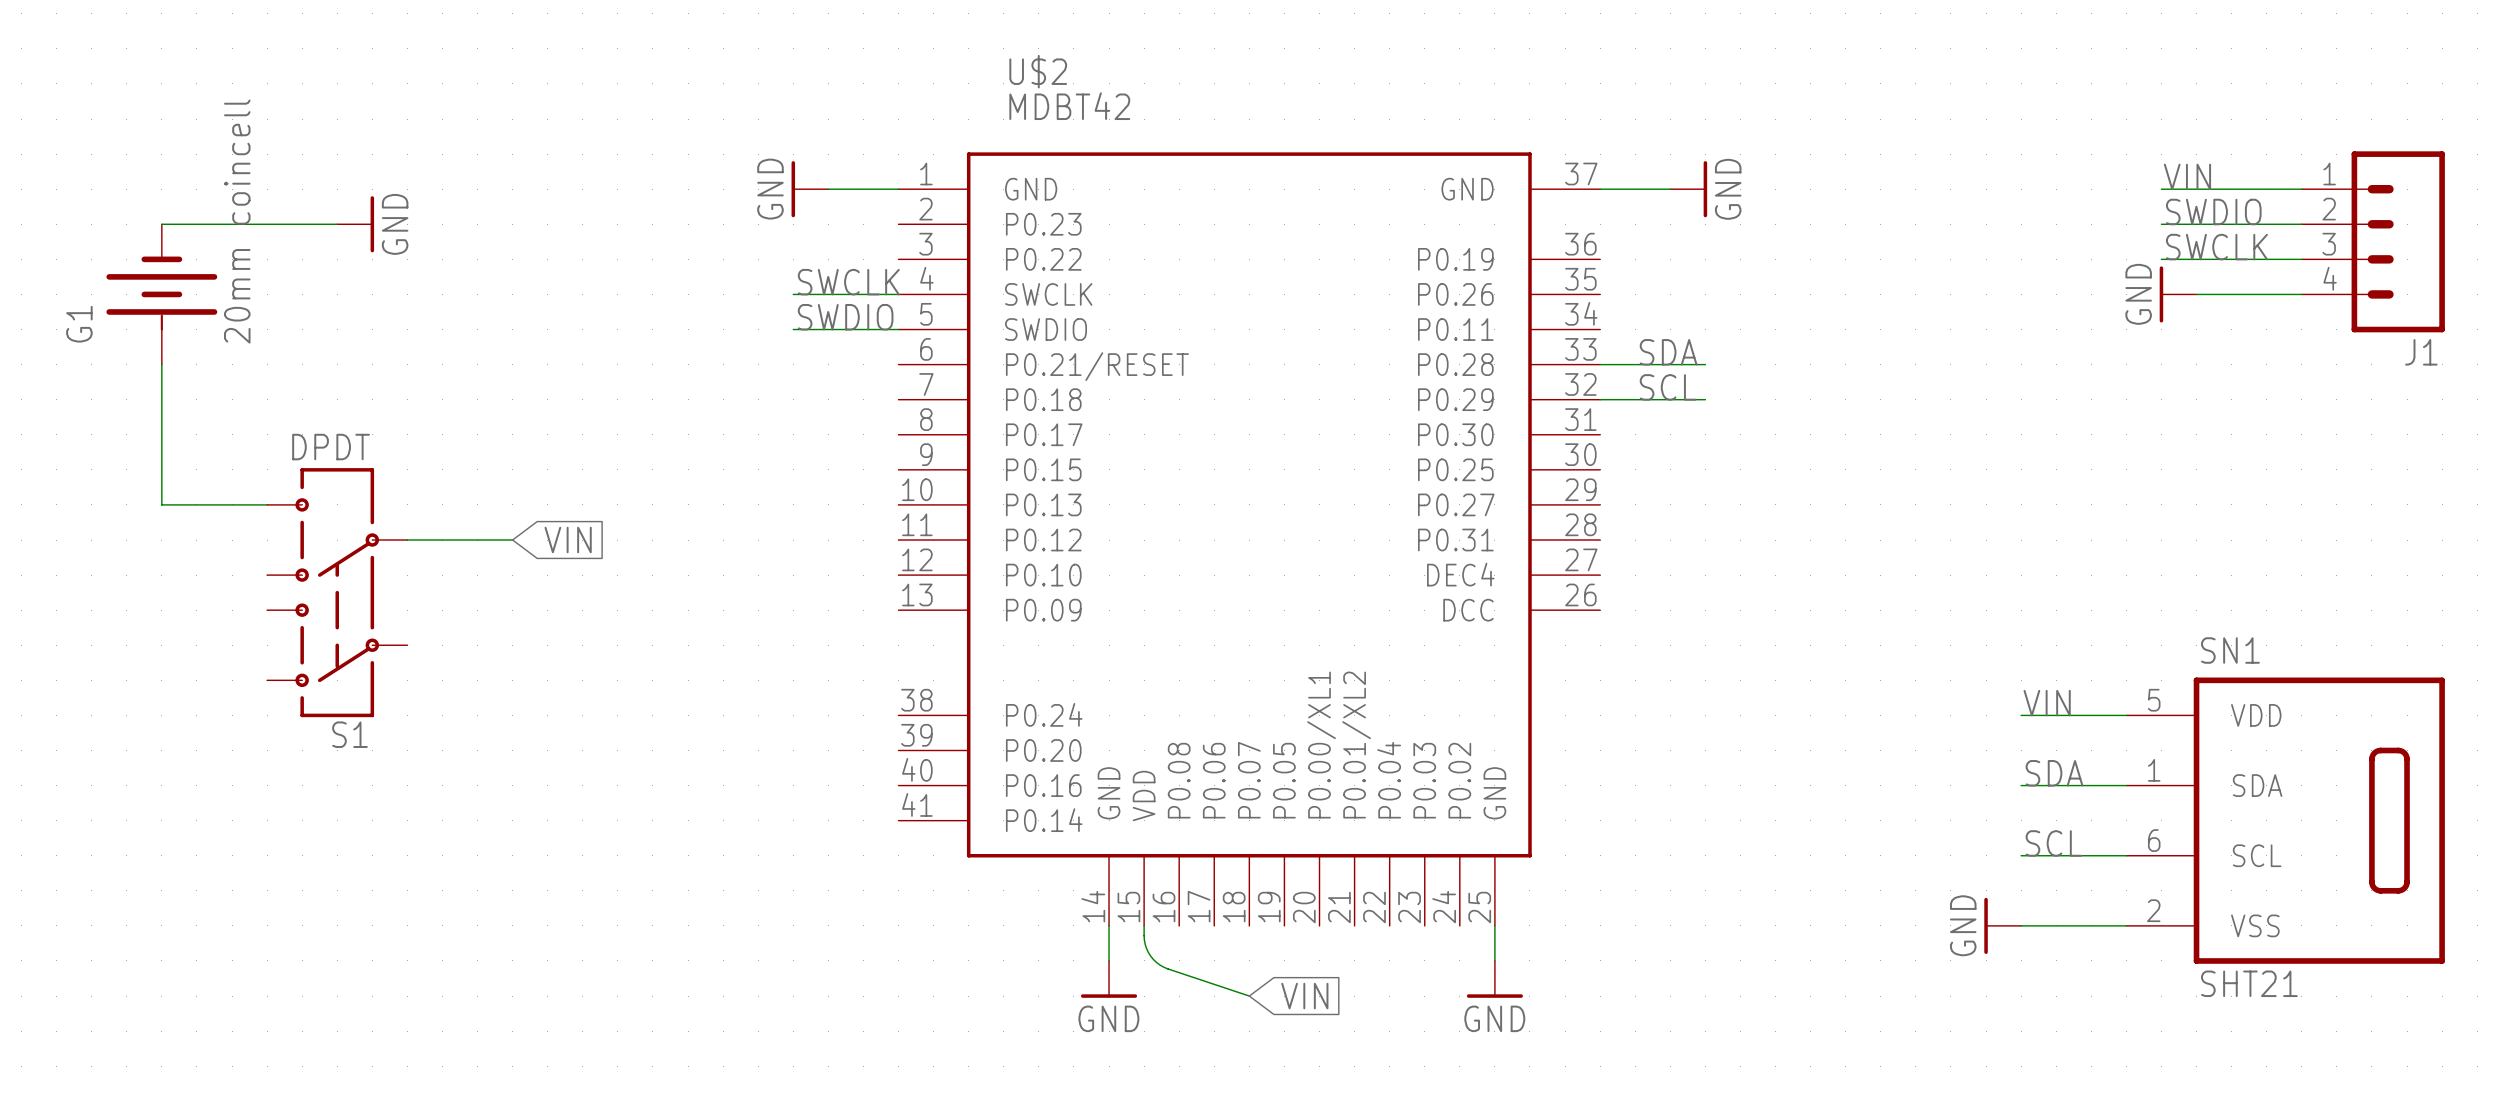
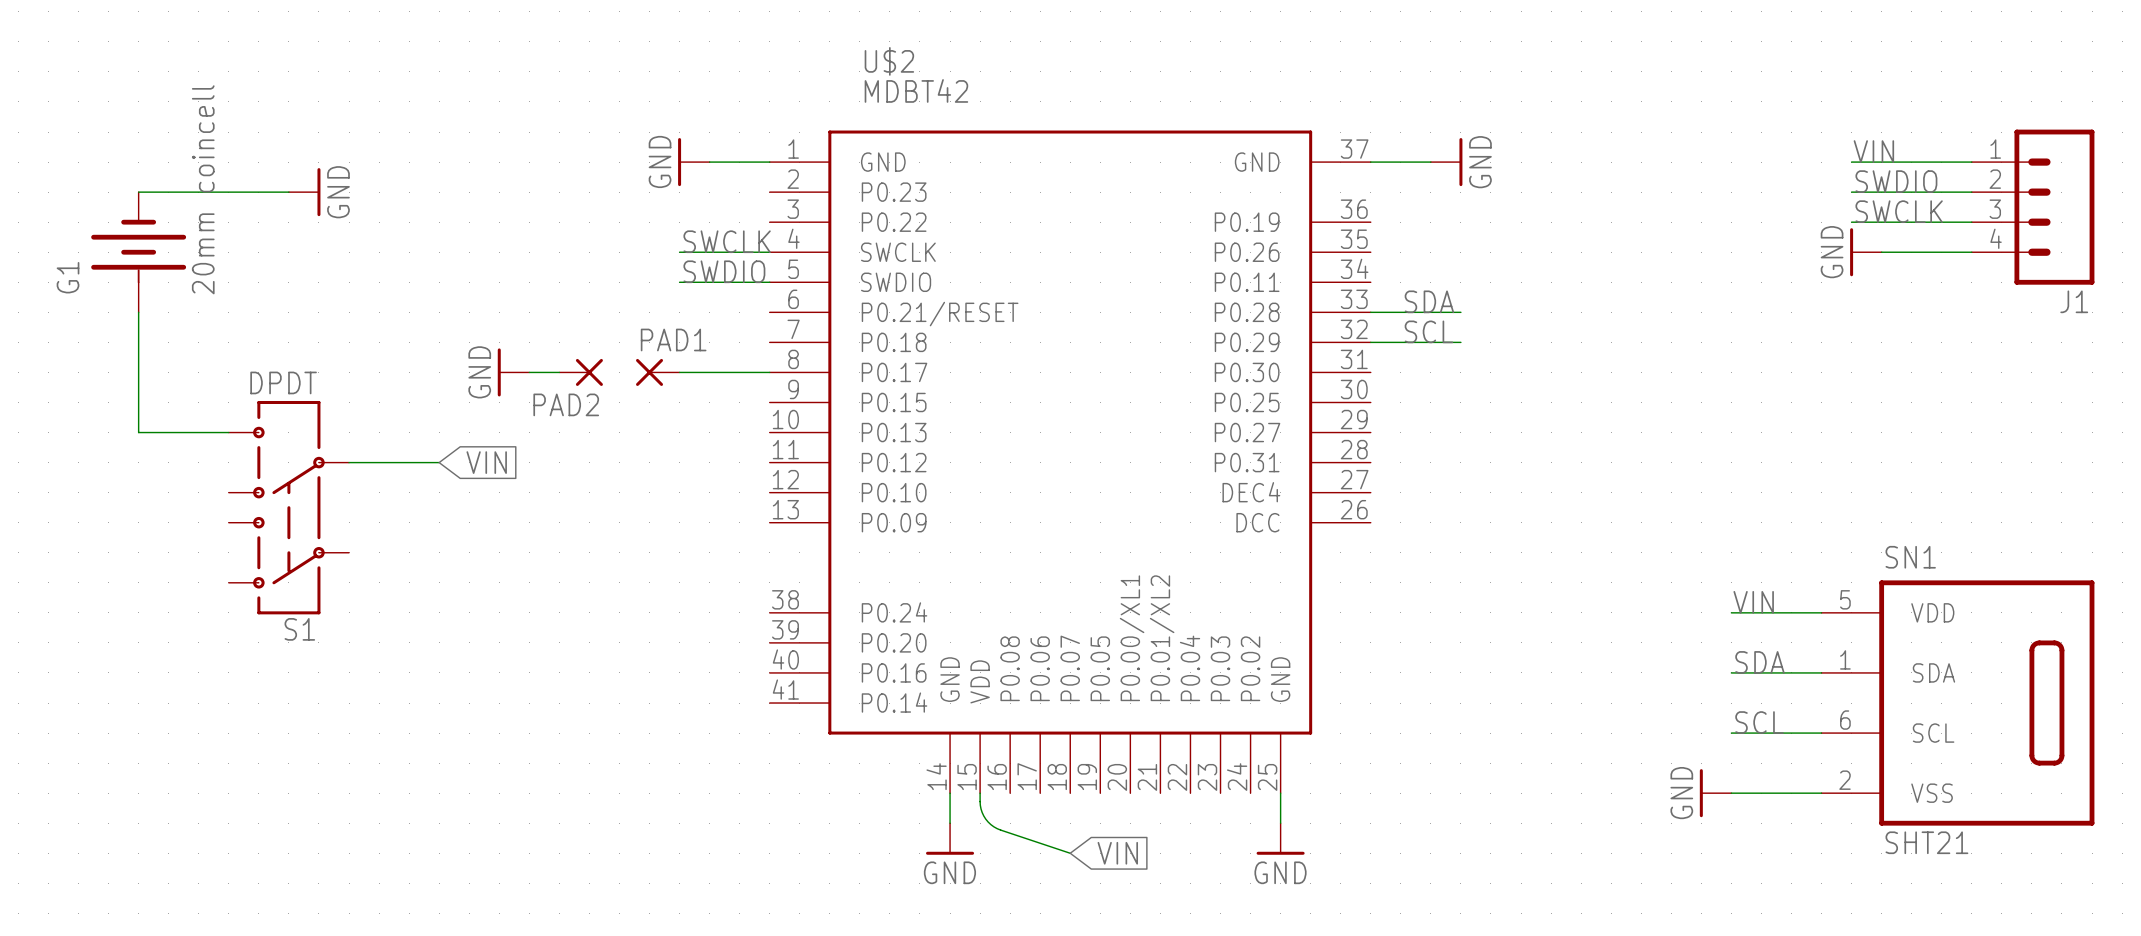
power symbol: none -> GND (513, 372)
wire: none -> (529, 372) (559, 372)
PAD2: none -> (581, 372)
PAD1: none -> (657, 372)
wire: none -> (679, 372) (769, 372)

